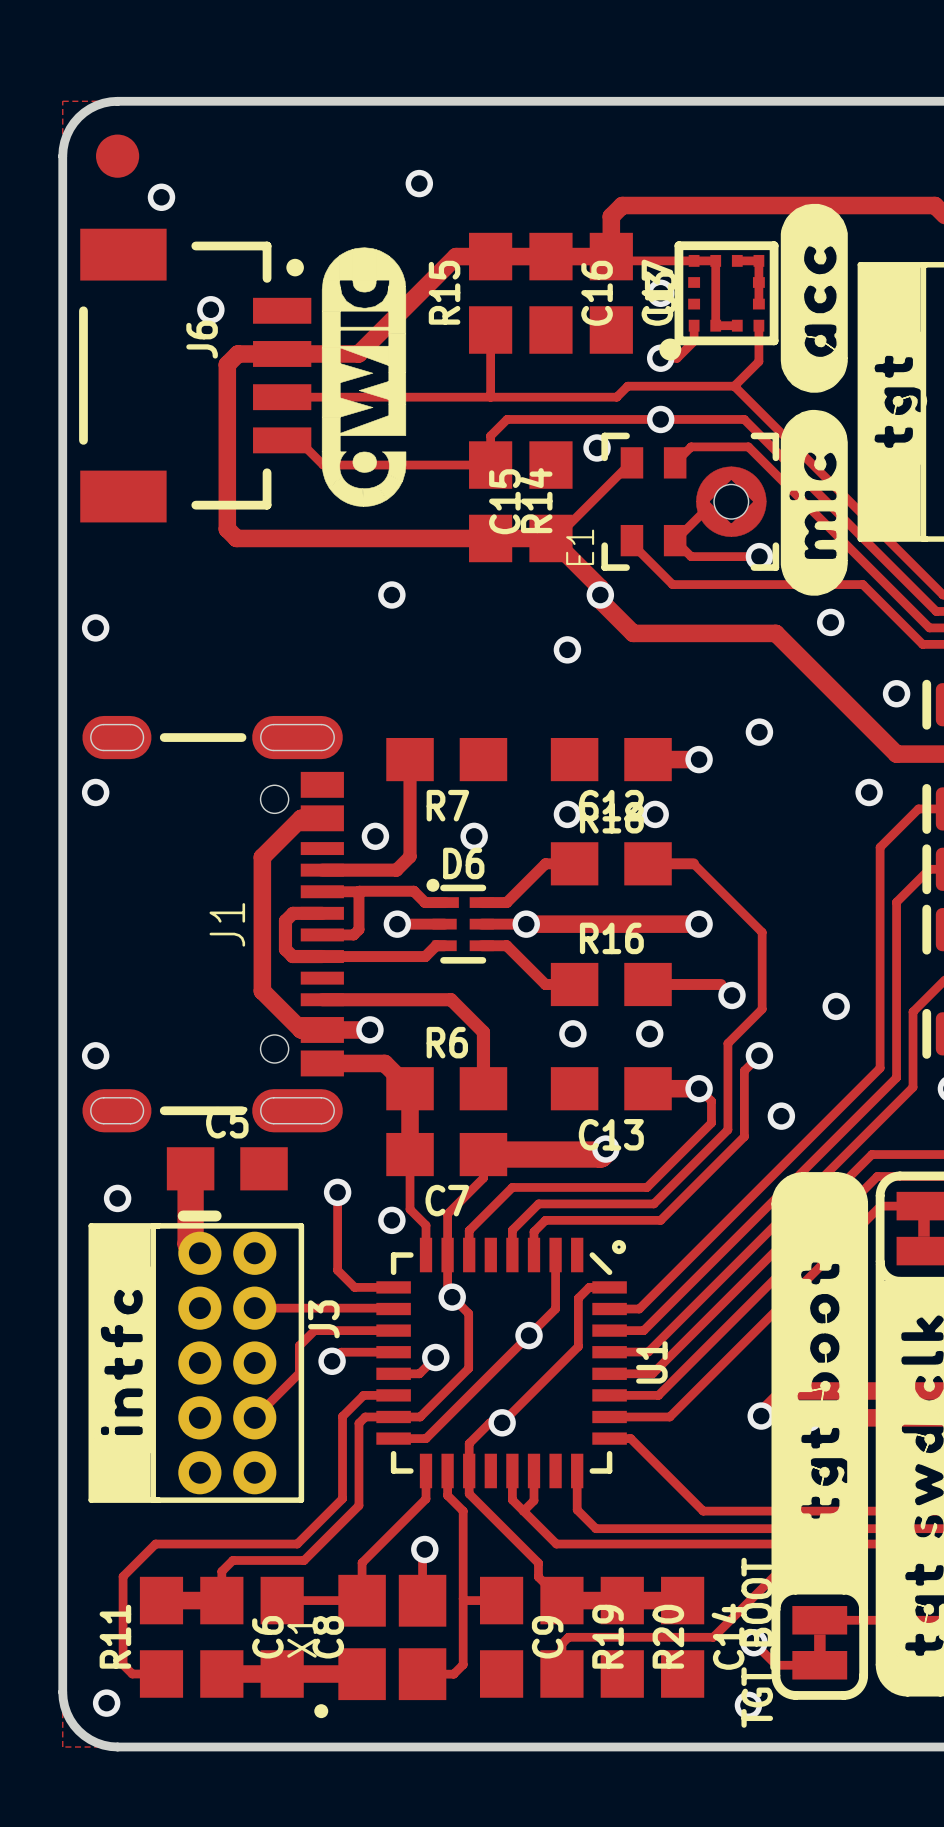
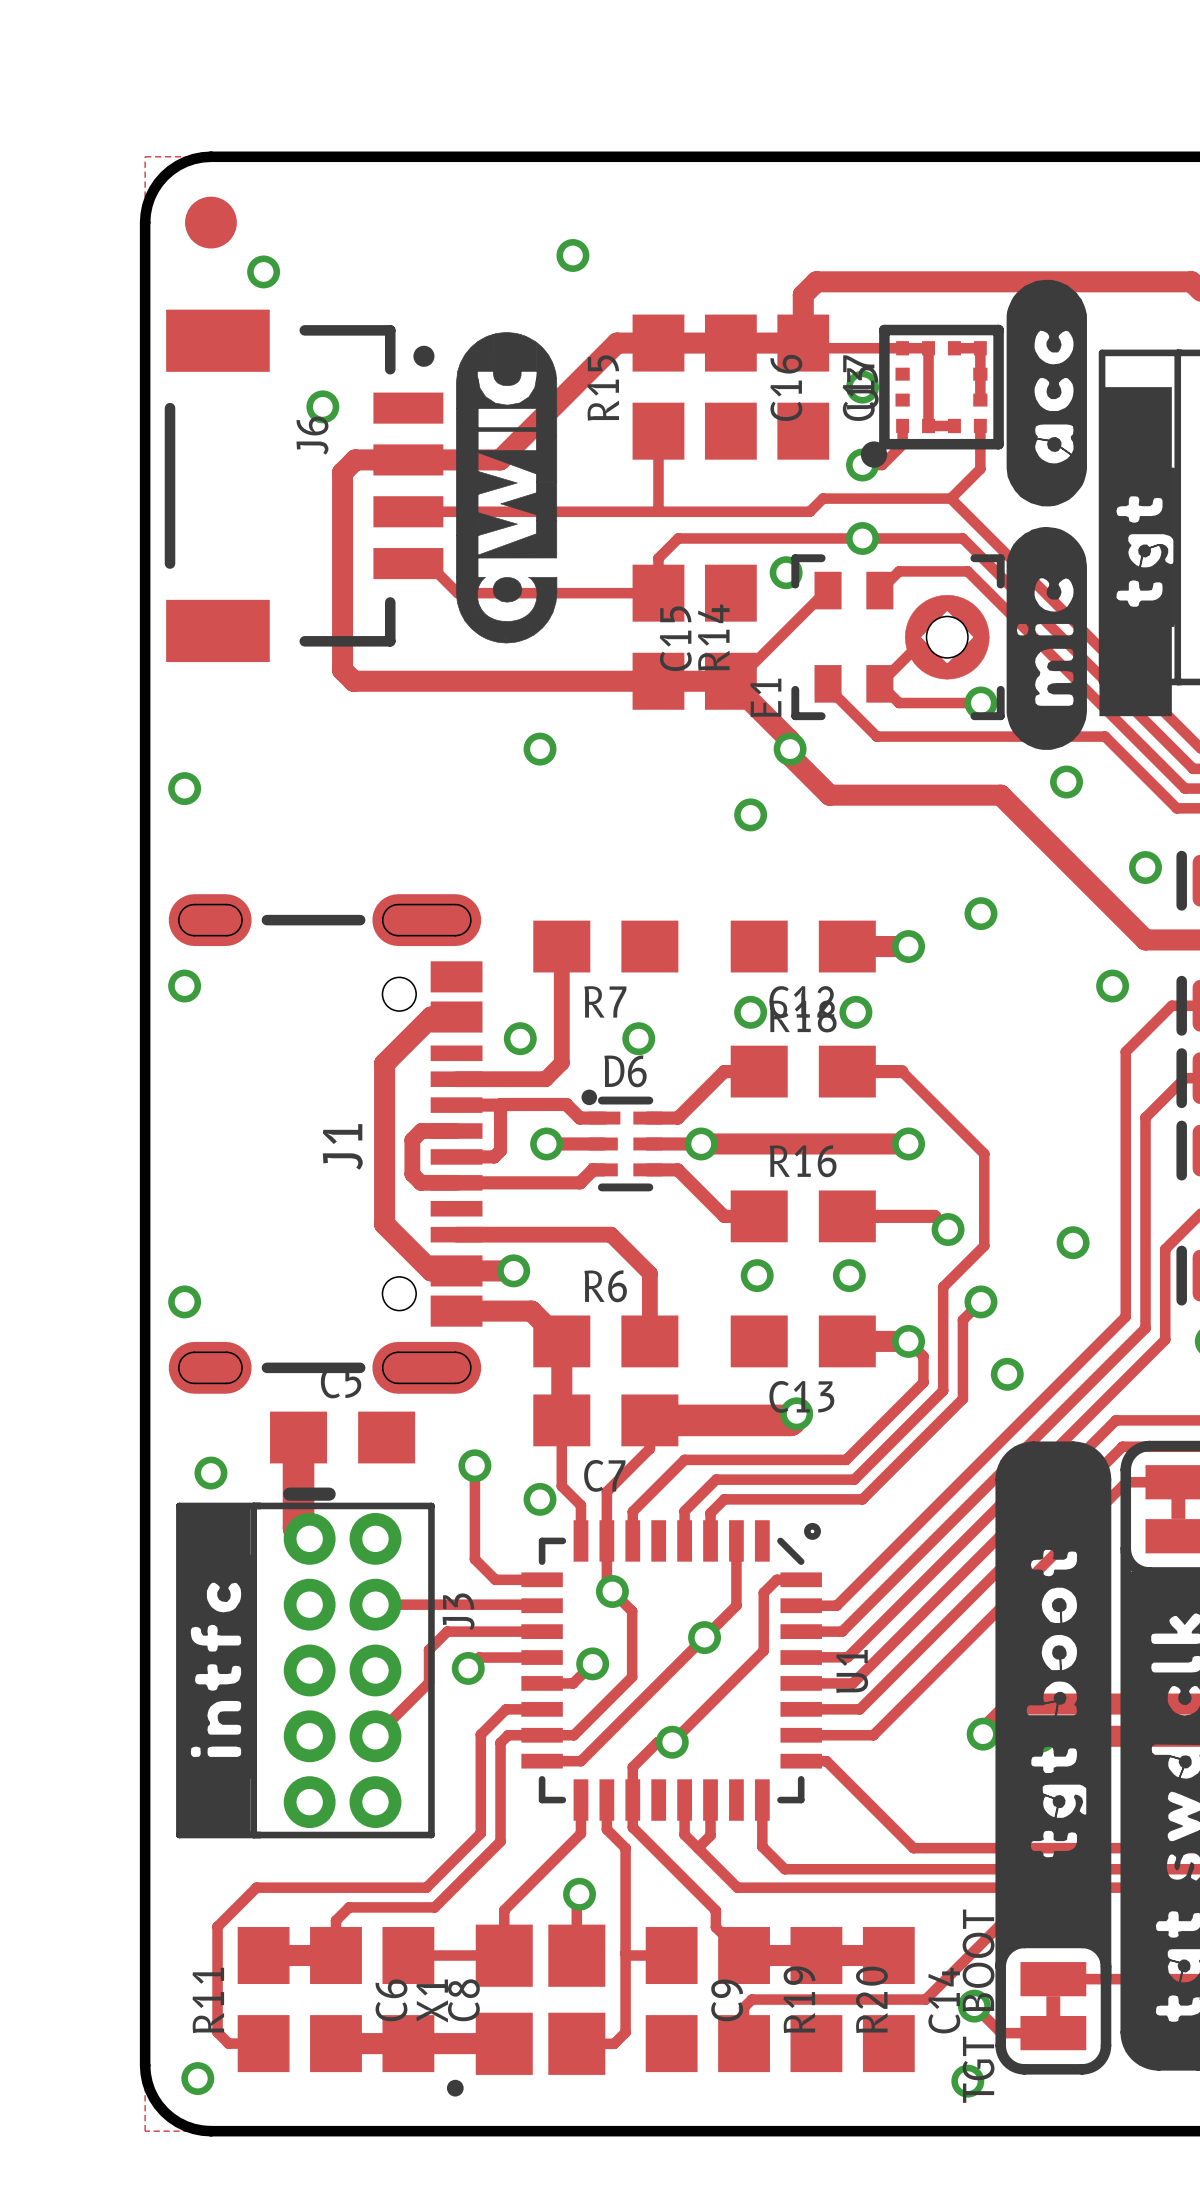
drawing position: (890, 300) -> (1135, 429)
drawing position: (895, 398) -> (1141, 547)
drawing position: (890, 500) -> (1135, 670)

